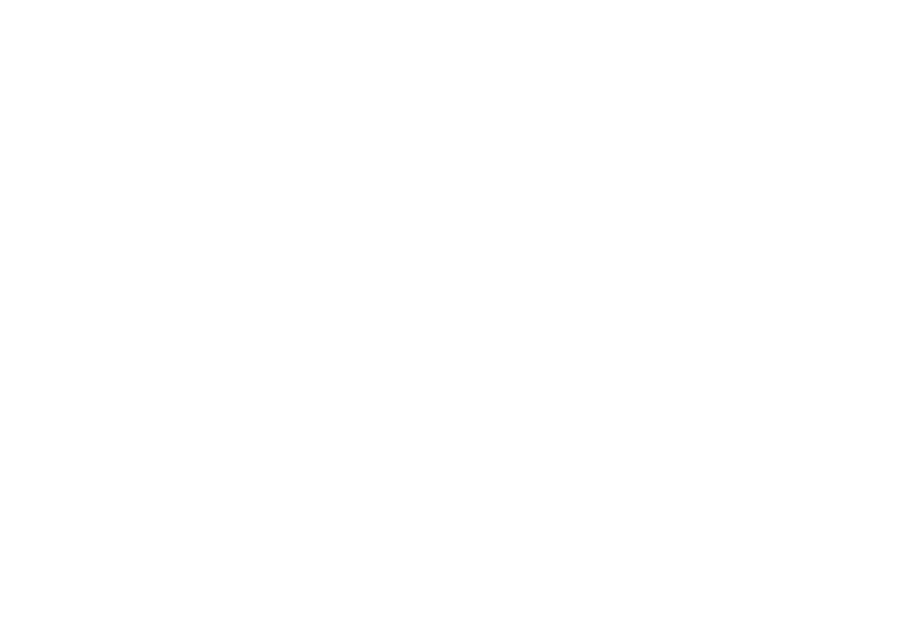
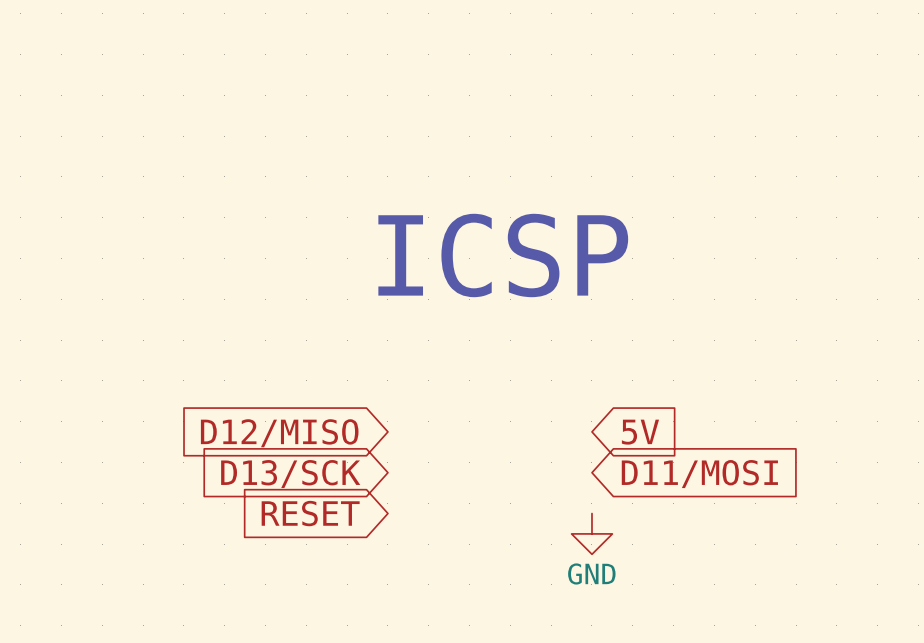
text: none -> ICSP (503, 255)
global label: none -> 5V (640, 432)
global label: none -> D12/MISO (279, 433)
global label: none -> D13/SCK (290, 474)
global label: none -> D11/MOSI (699, 474)
global label: none -> RESET (310, 513)
power symbol: none -> GND (591, 533)

